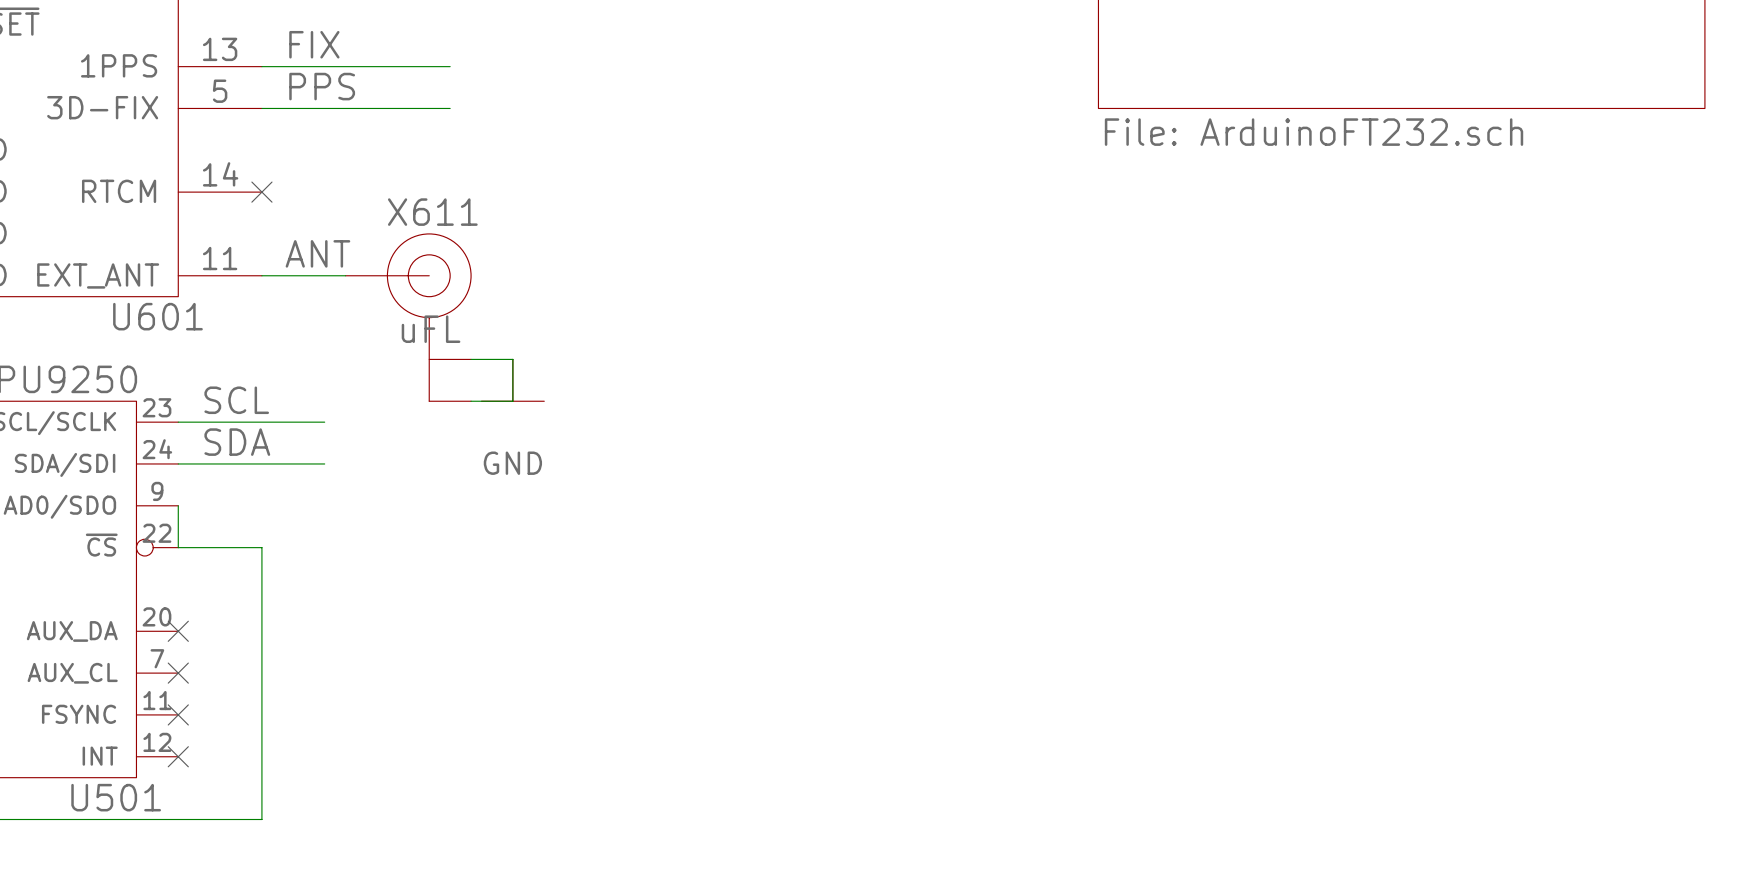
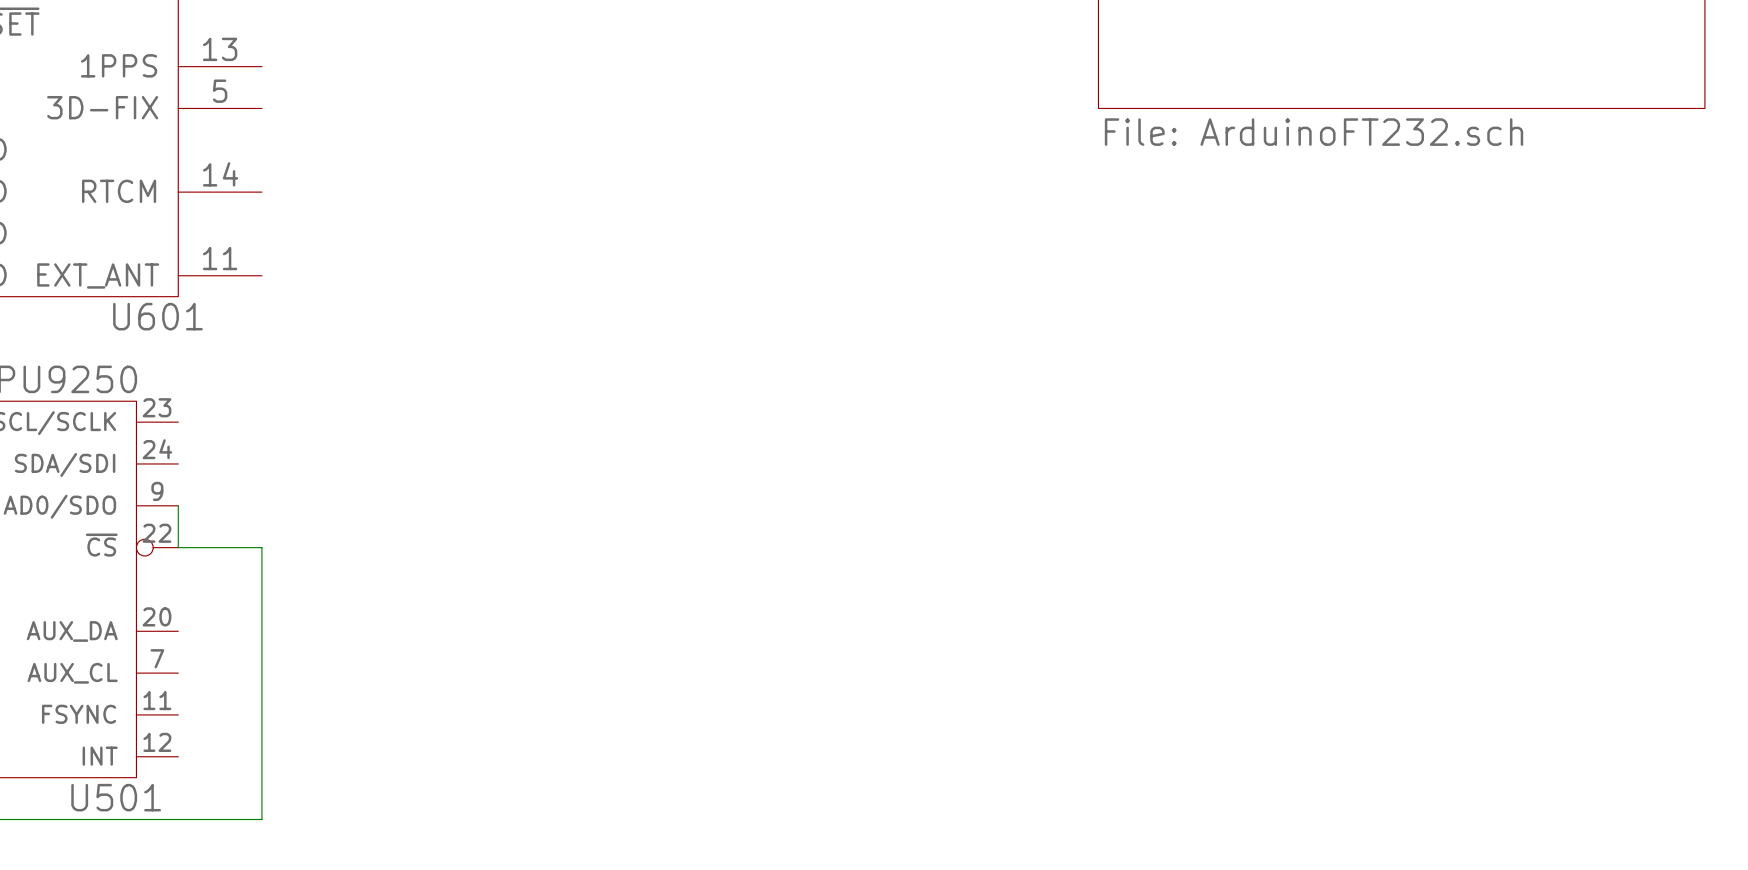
label: FIX (314, 44) -> none
wire: (261, 66) (450, 66) -> none
label: PPS (322, 86) -> none
wire: (261, 108) (450, 108) -> none
no-connect mark: (261, 192) -> none
label: ANT (317, 253) -> none
wire: (261, 275) (345, 275) -> none
X611: uFL (408, 317) -> none
wire: (471, 359) (512, 359) (512, 401) (471, 401) -> none
power symbol: GND (512, 380) -> none
label: SCL (236, 400) -> none
wire: (178, 422) (324, 422) -> none
label: SDA (237, 442) -> none
wire: (178, 463) (324, 463) -> none
no-connect mark: (178, 631) -> none
no-connect mark: (178, 673) -> none
no-connect mark: (178, 714) -> none
no-connect mark: (178, 756) -> none

